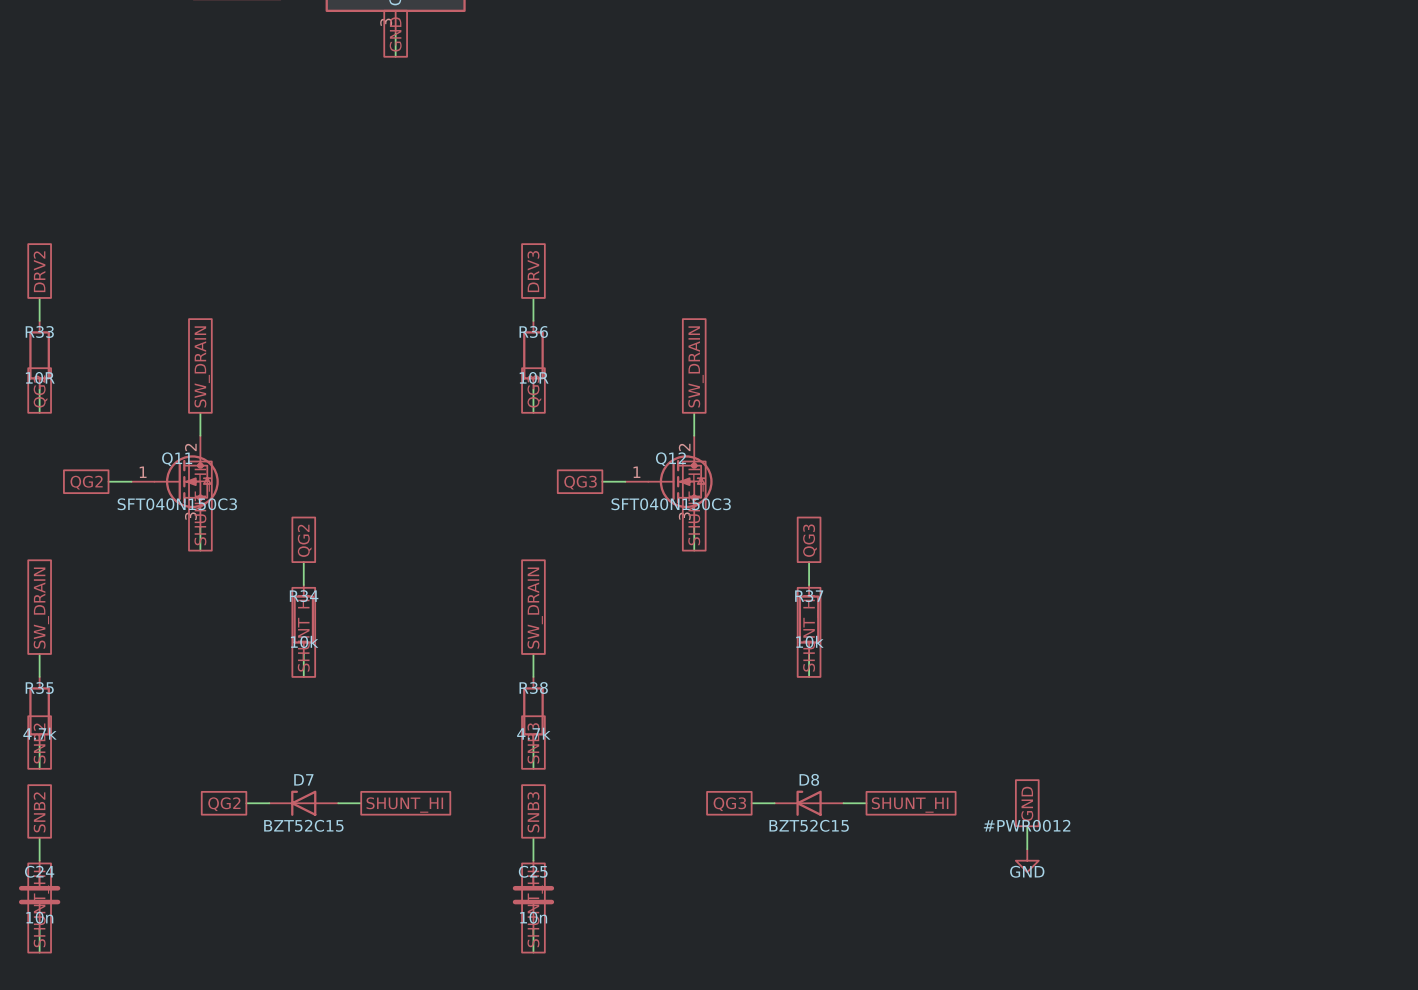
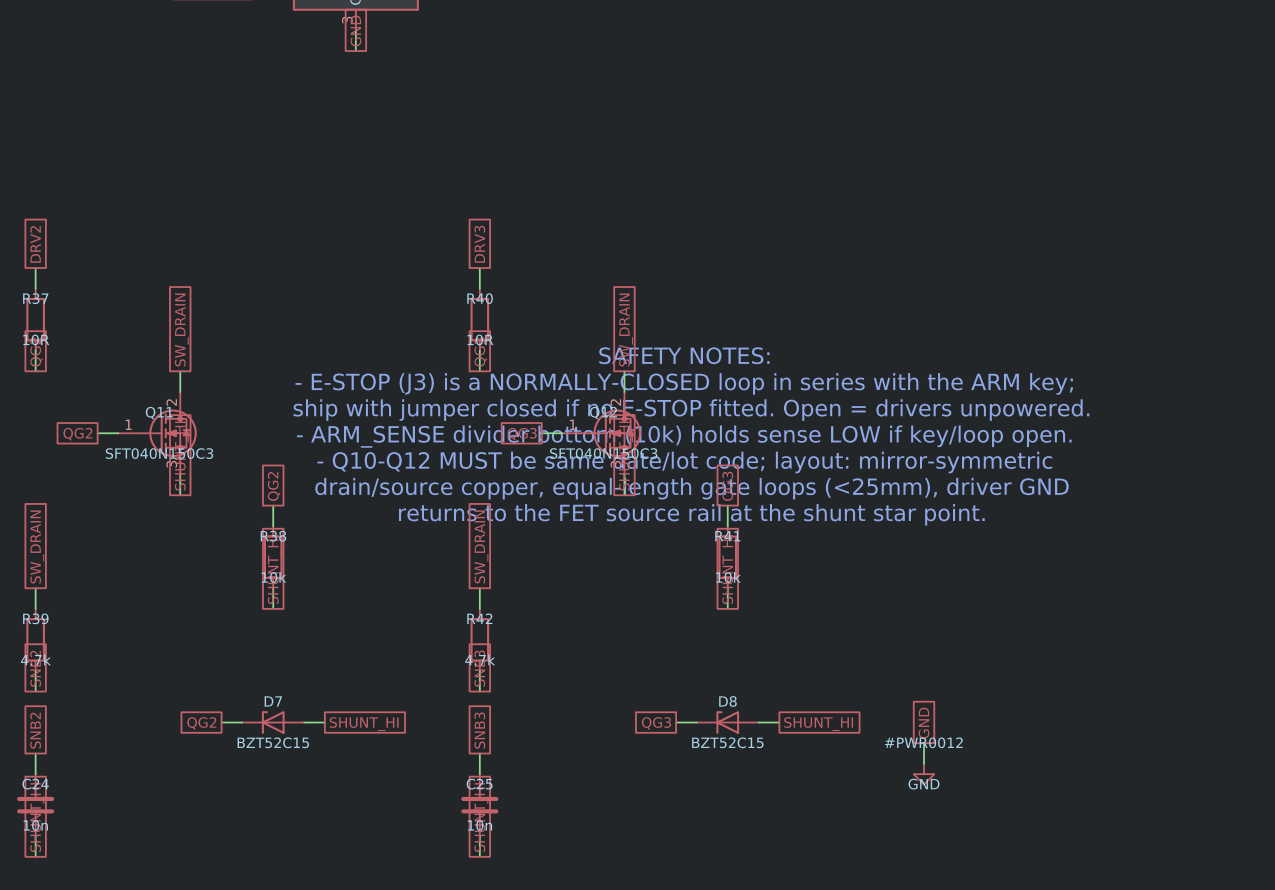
R33 name: R33 (39, 331) -> R37 (35, 298)
R36 name: R36 (533, 331) -> R40 (480, 298)
text: none -> SAFETY NOTES: (684, 355)
text: none -> - E-STOP (J3) is a NORMALLY-CLOSED loop in series with the ARM key; (684, 383)
text: none -> ship with jumper closed if no E-STOP fitted. Open = drivers unpowered. (691, 410)
text: none -> - ARM_SENSE divider bottom (10k) holds sense LOW if key/loop open. (684, 436)
text: none -> - Q10-Q12 MUST be same date/lot code; layout: mirror-symmetric (684, 462)
text: none -> drain/source copper, equal-length gate loops (<25mm), driver GND (692, 488)
text: none -> returns to the FET source rail at the shunt star point. (691, 514)
R34 name: R34 (304, 596) -> R38 (273, 536)
R37 name: R37 (809, 596) -> R41 (727, 536)
R35 name: R35 (39, 688) -> R39 (35, 618)
R38 name: R38 (533, 688) -> R42 (479, 618)

